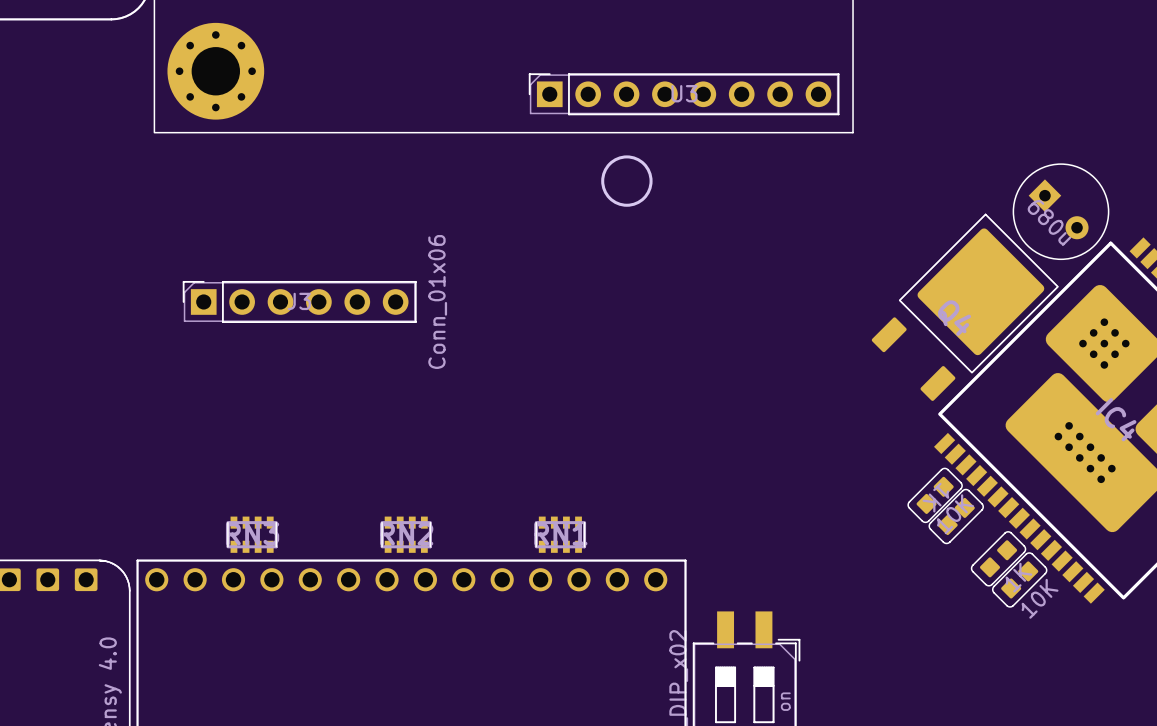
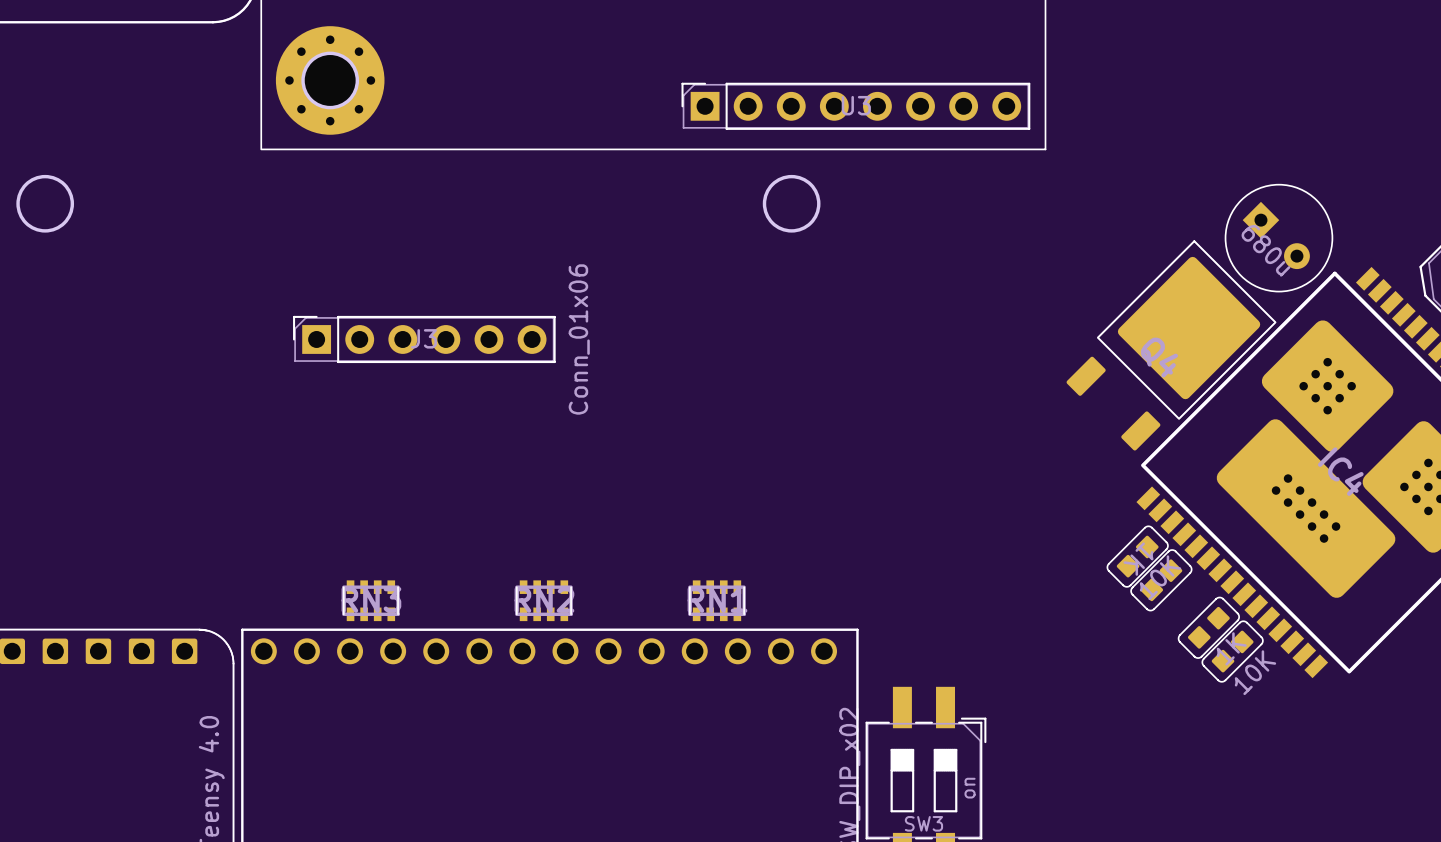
round board edge: none -> [301, 51, 360, 110]

